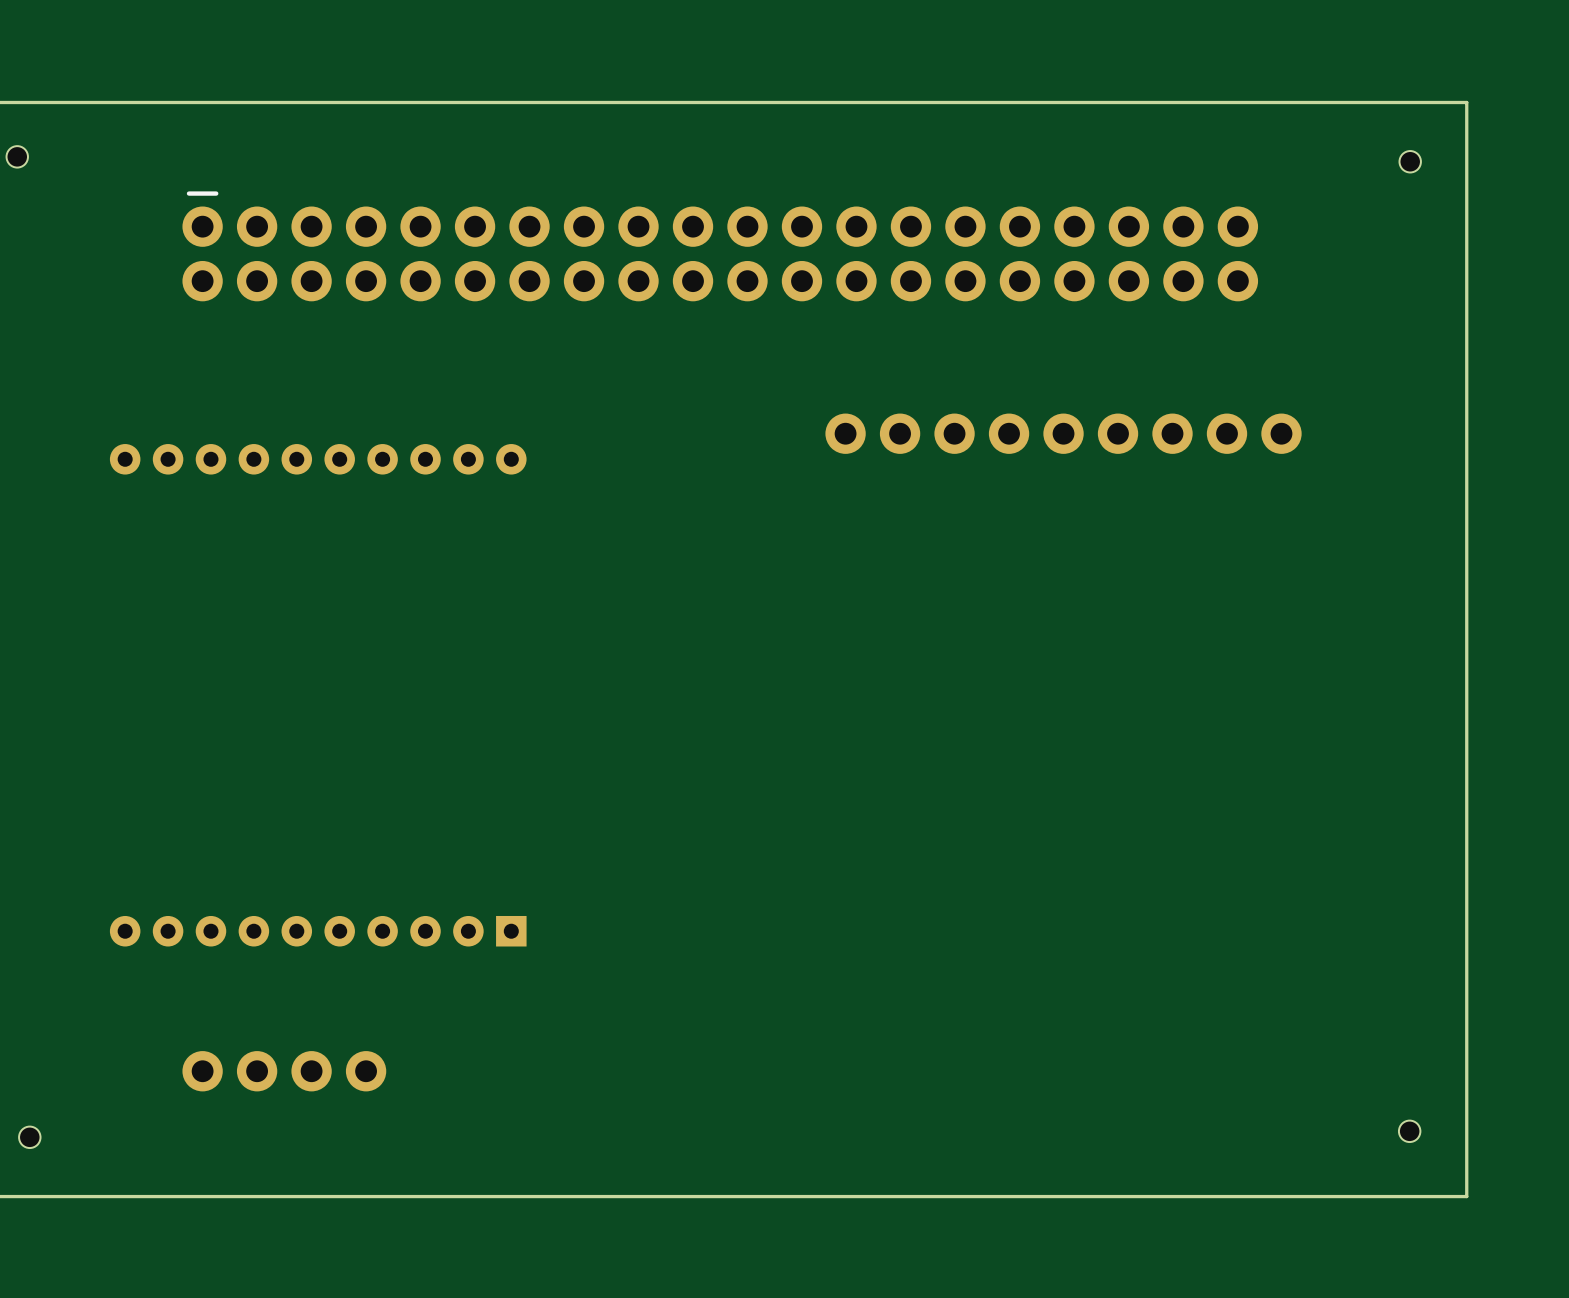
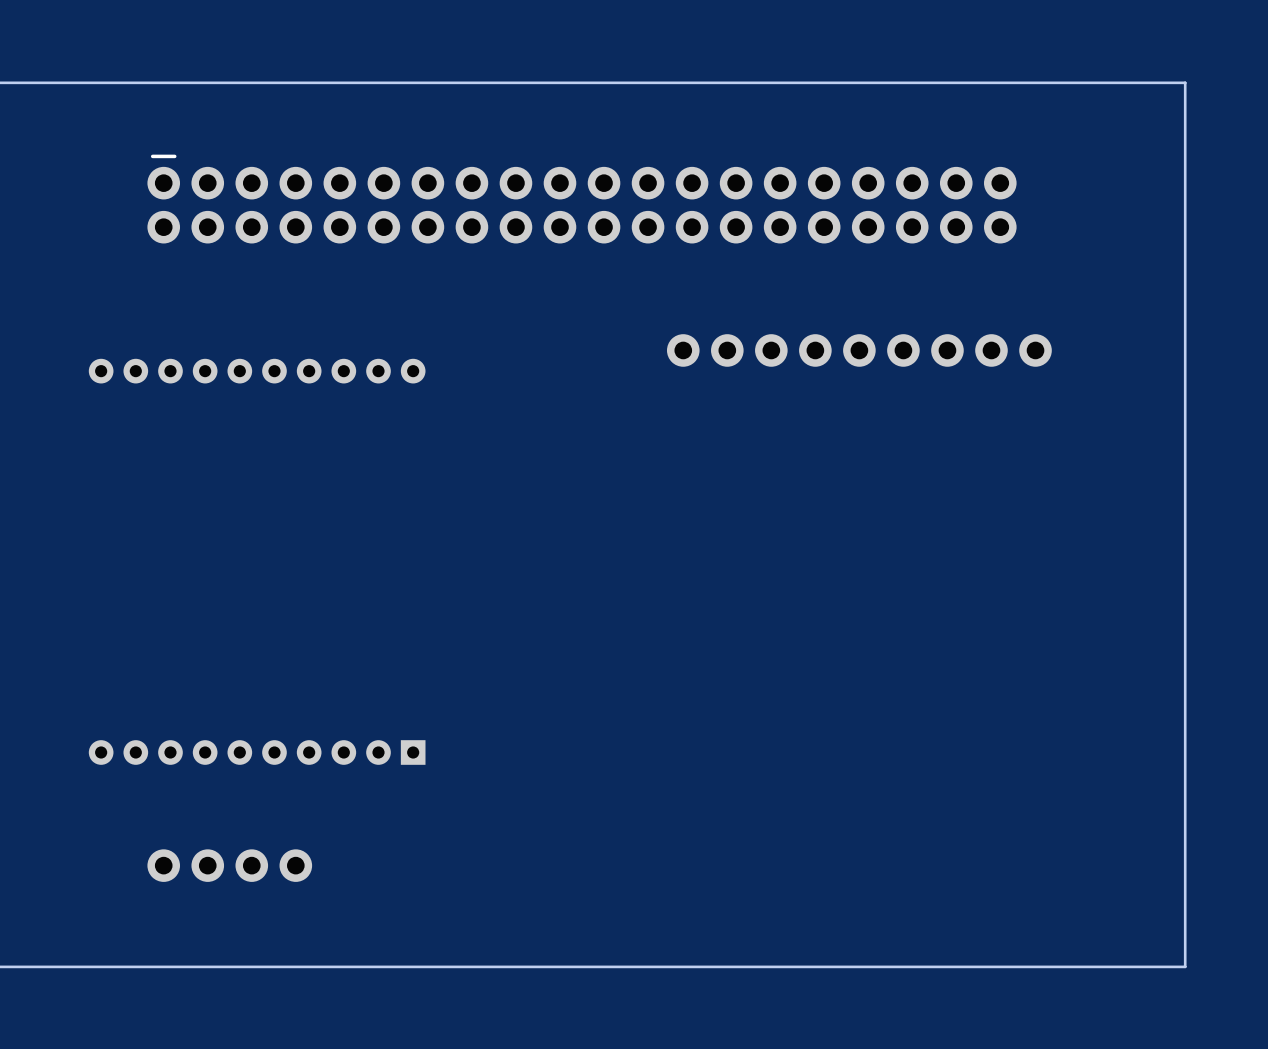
hole: (17, 156) -> none
hole: (1410, 161) -> none
hole: (1409, 1131) -> none
hole: (29, 1137) -> none

